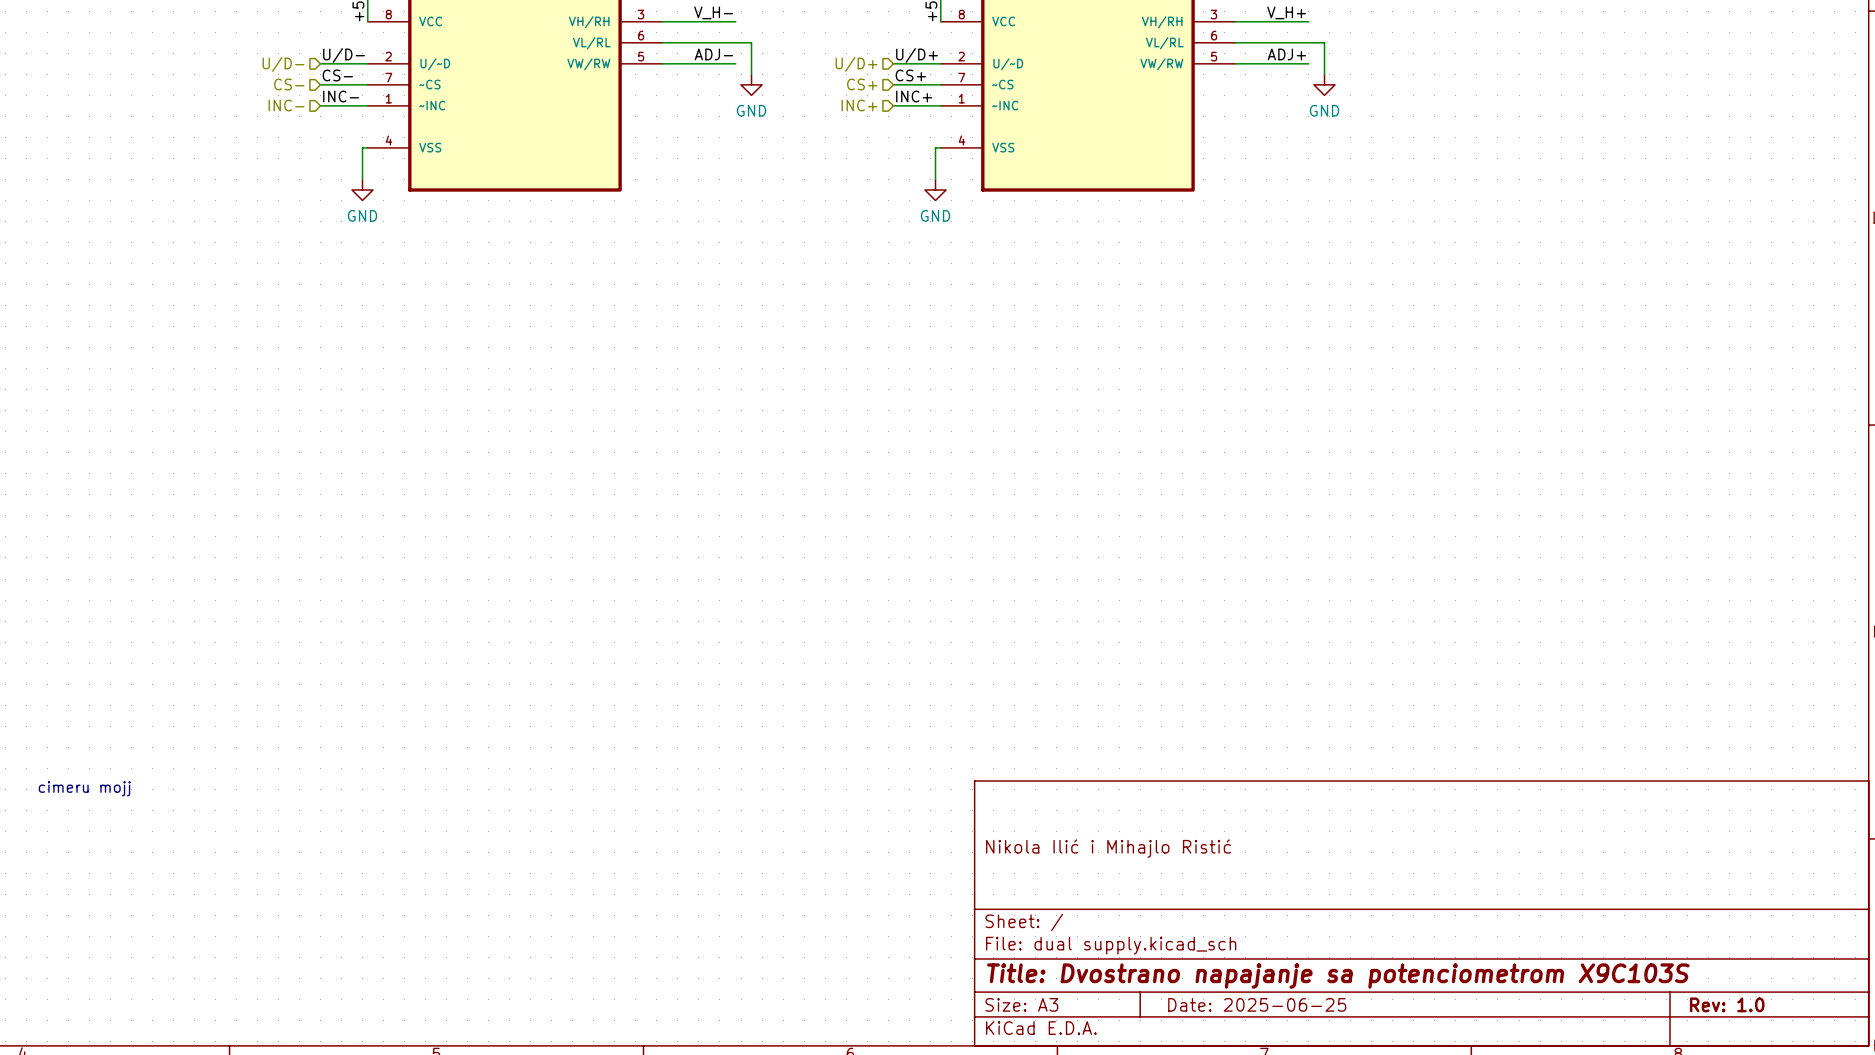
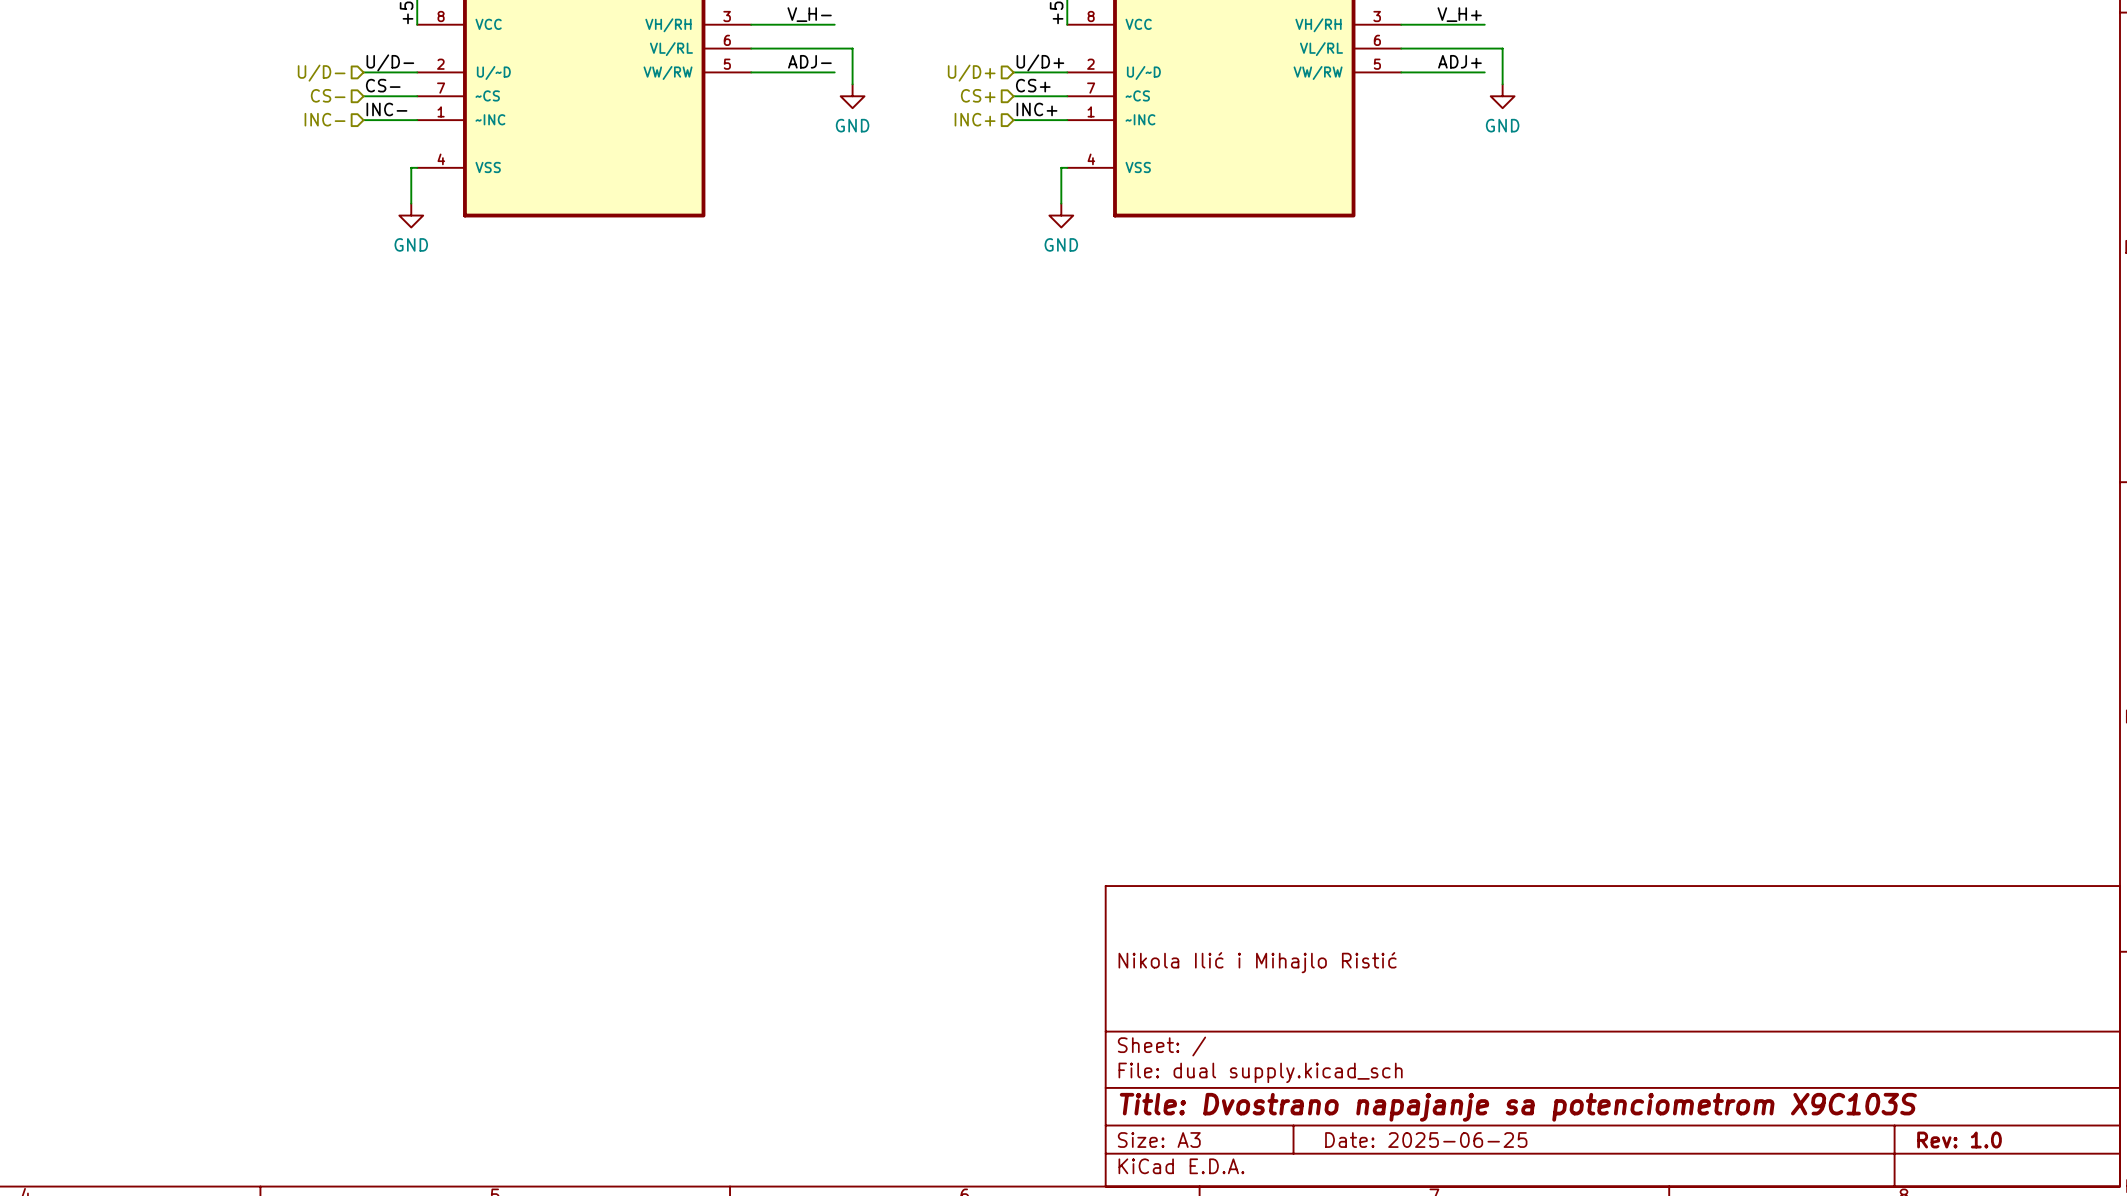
text: cimeru mojj (84, 788) -> none

